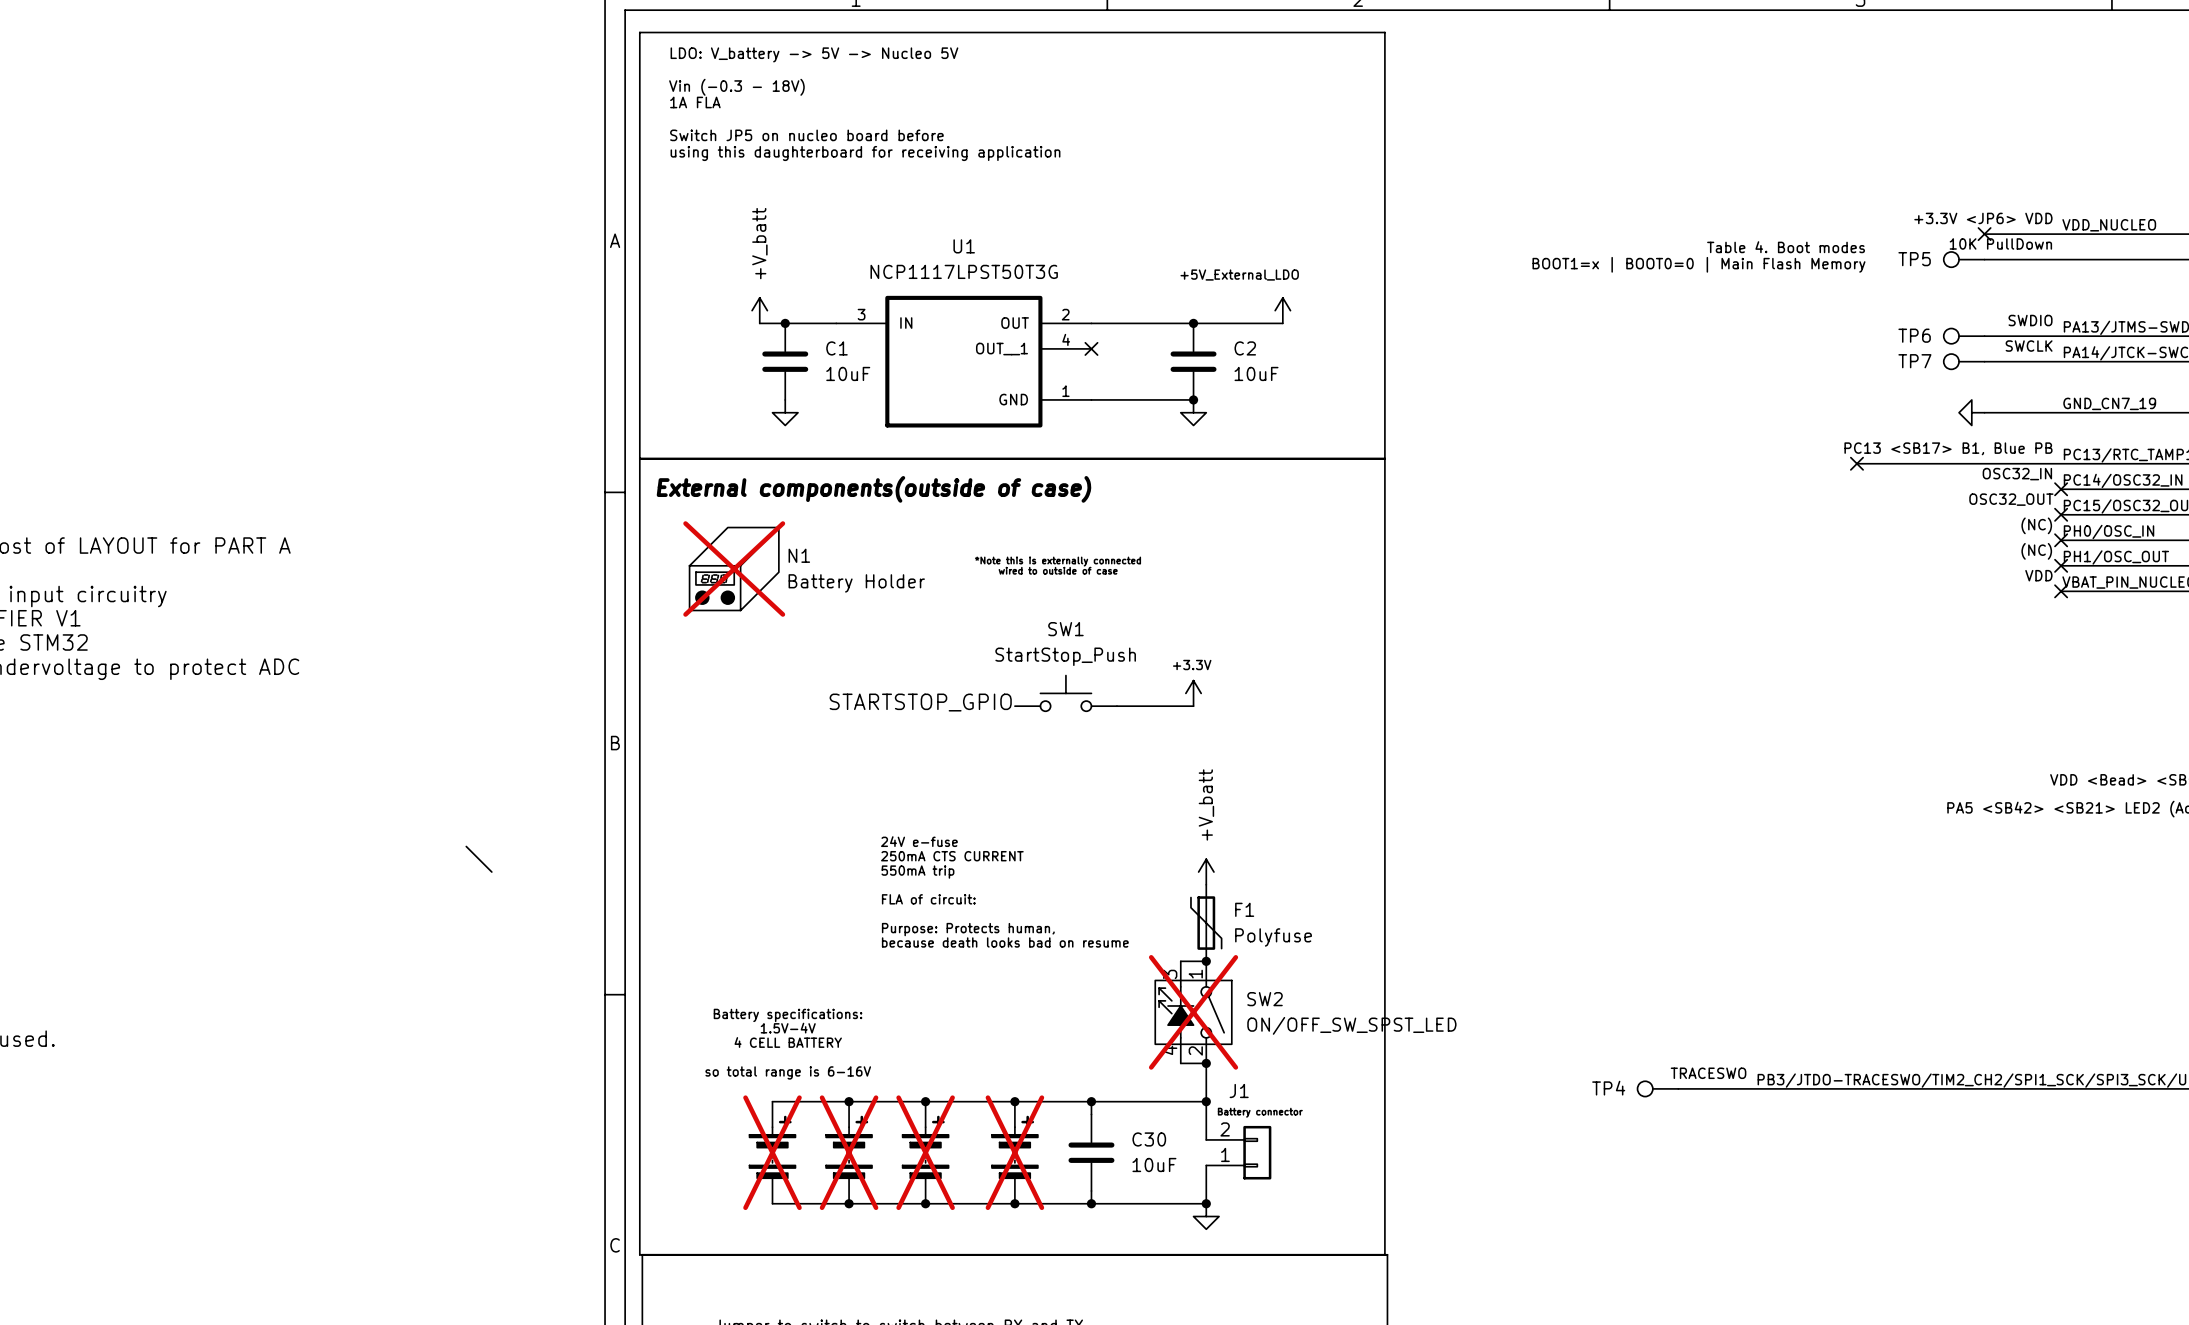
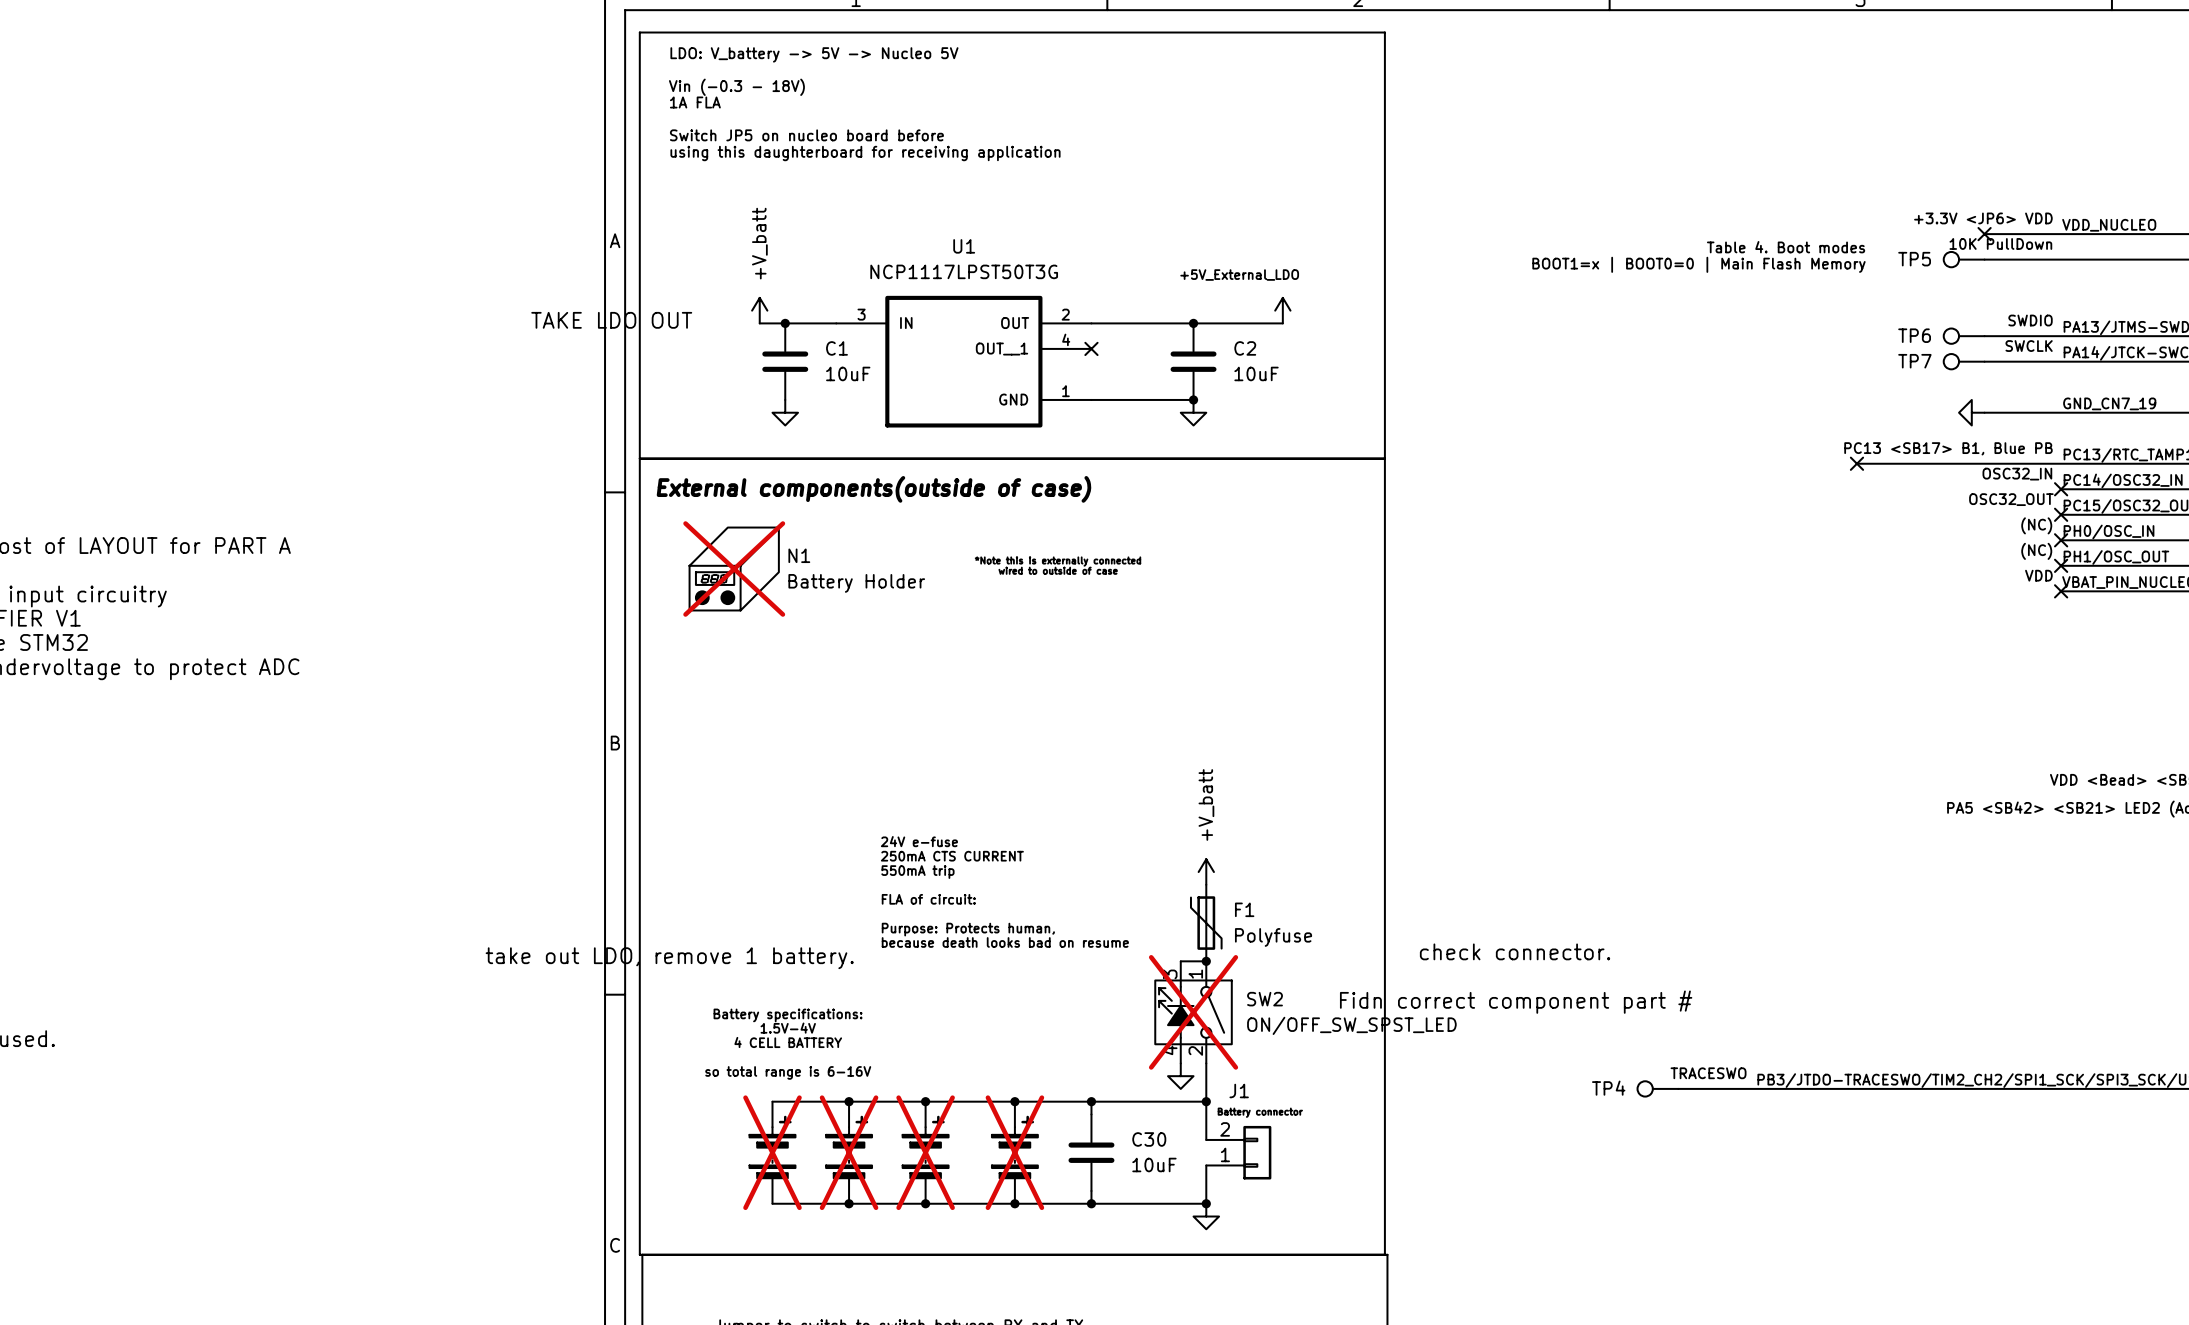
text: none -> TAKE LDO OUT (611, 320)
SW1: StartStop_Push (1065, 693) -> none
power symbol: +3.3V (1193, 693) -> none
label: STARTSTOP_GPIO (920, 702) -> none
wire: (1116, 706) (1193, 706) -> none
wire: (466, 846) (491, 872) -> none
text: none -> check connector. (1515, 951)
text: none -> take out LDO, remove 1 battery. (669, 958)
text: none -> Fidn correct component part # (1516, 1002)
wire: (1180, 1063) (1206, 1063) -> none
junction: (1206, 1063) -> none
power symbol: none -> (1180, 1076)

